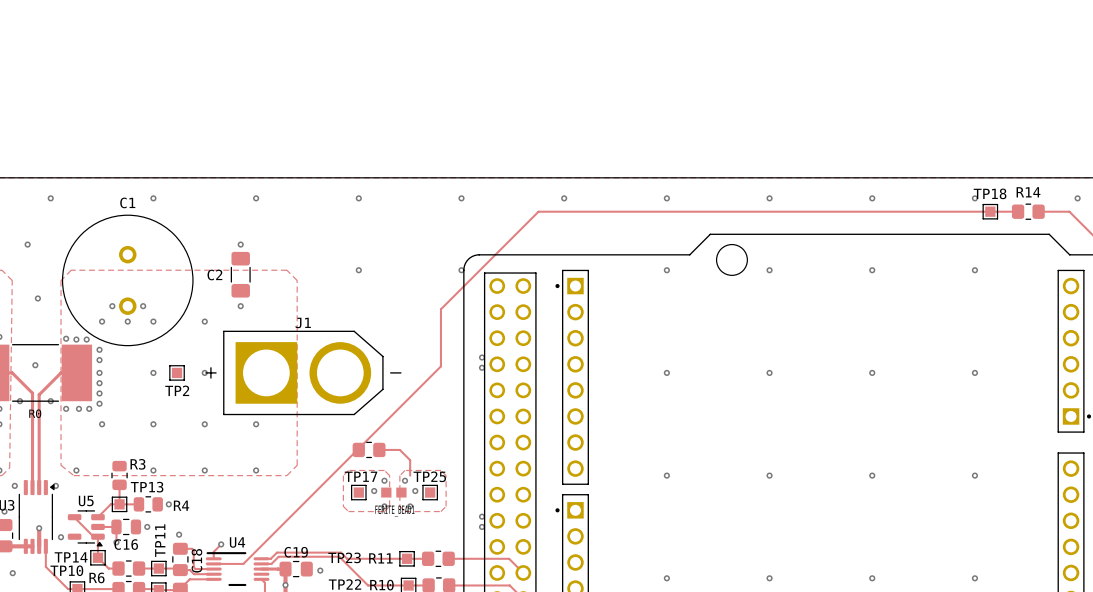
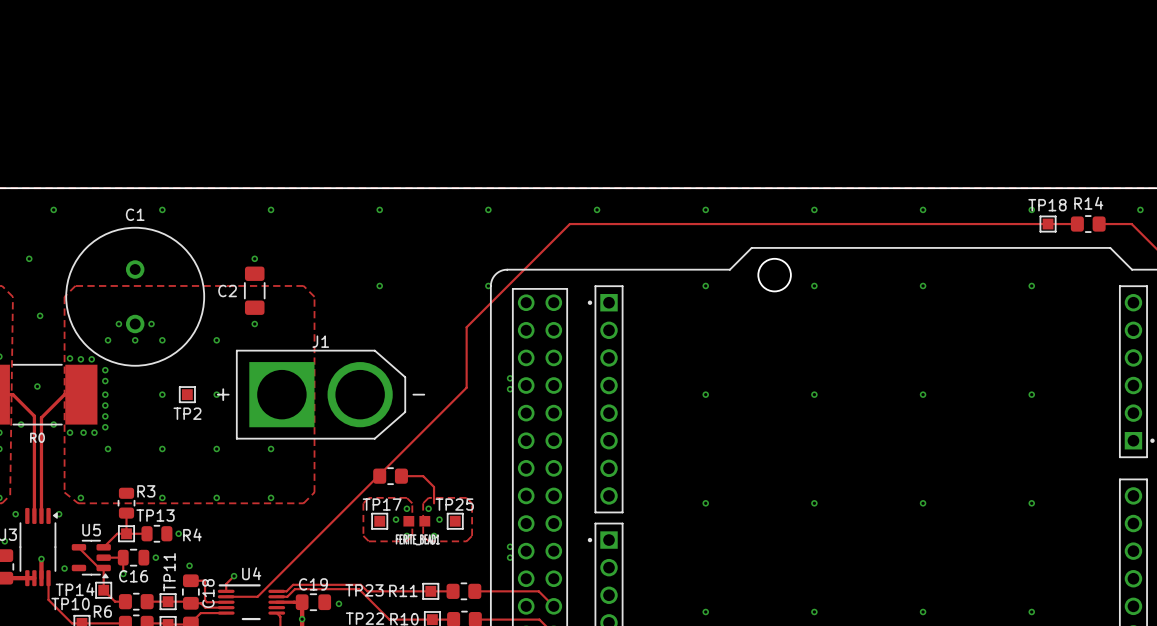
via: (12, 573) -> none

